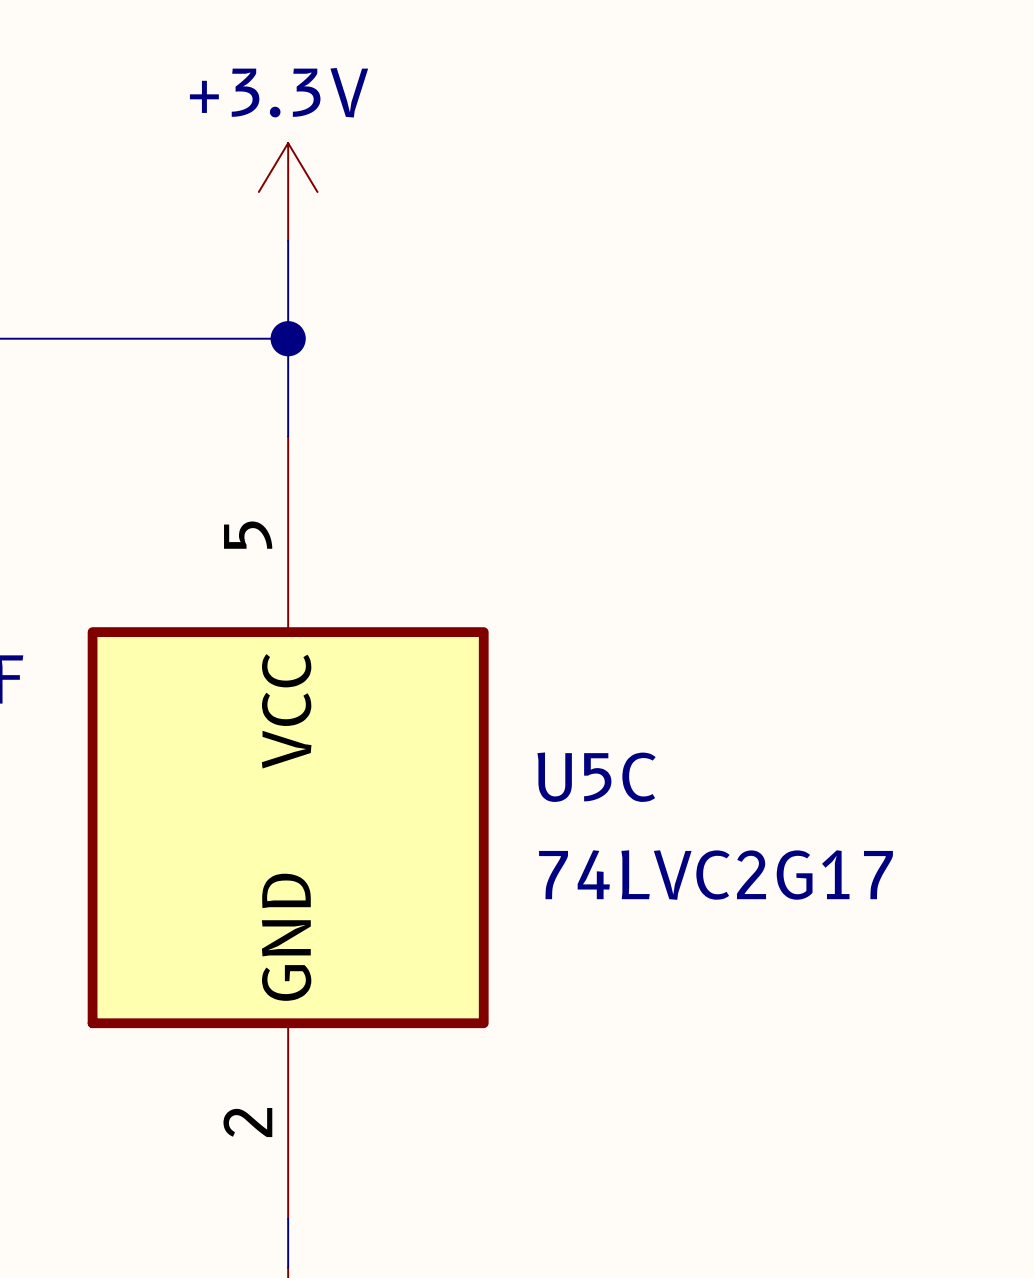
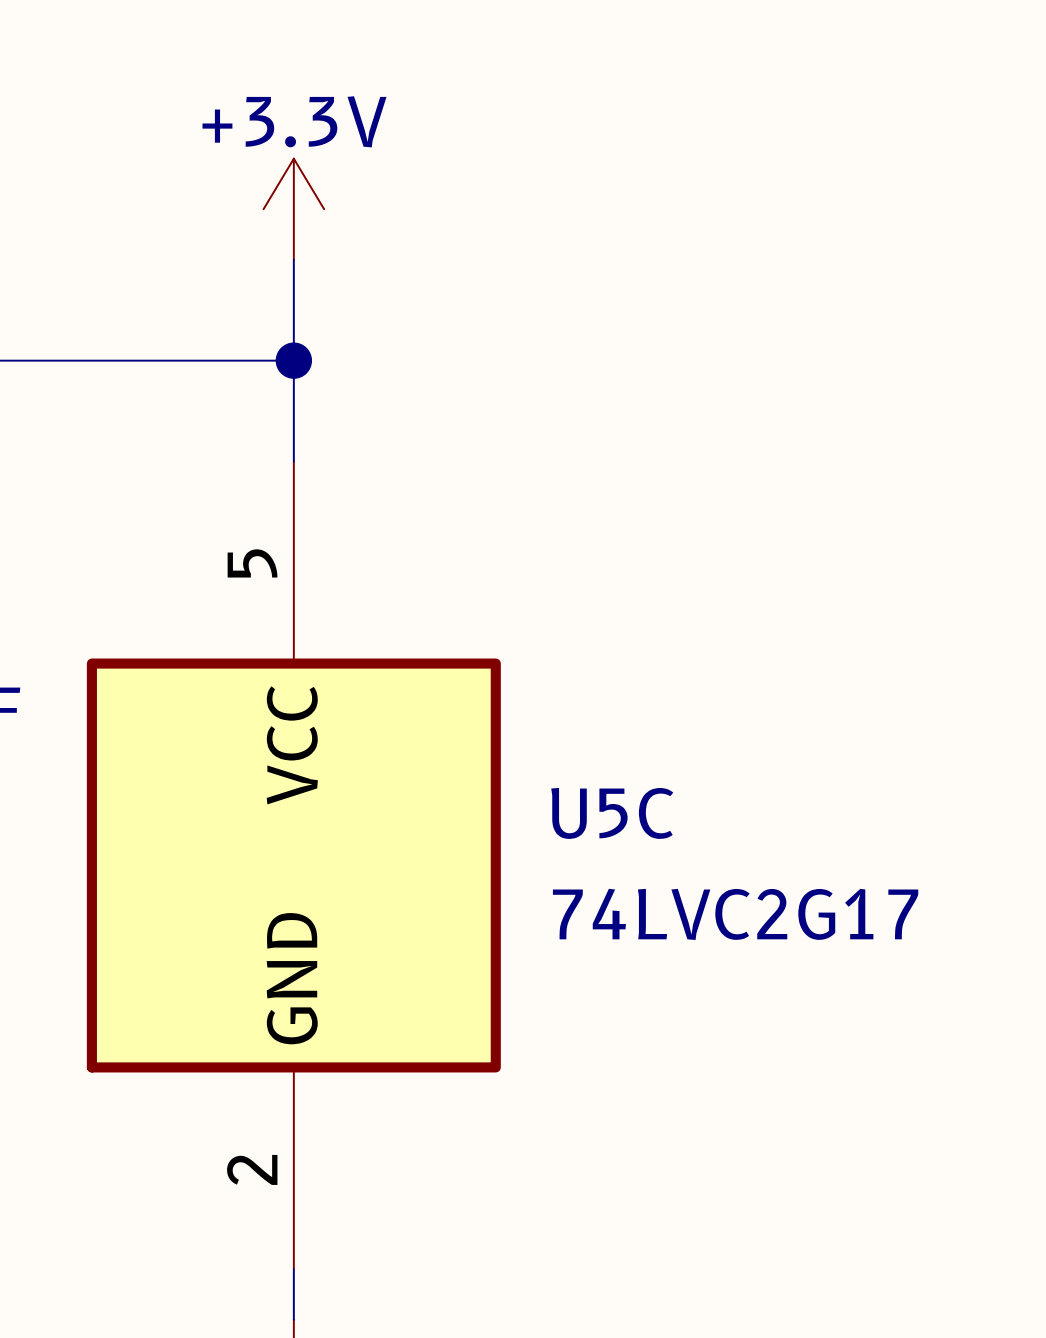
power symbol text position: +3.3V (279, 92) -> +3.3V (294, 121)

